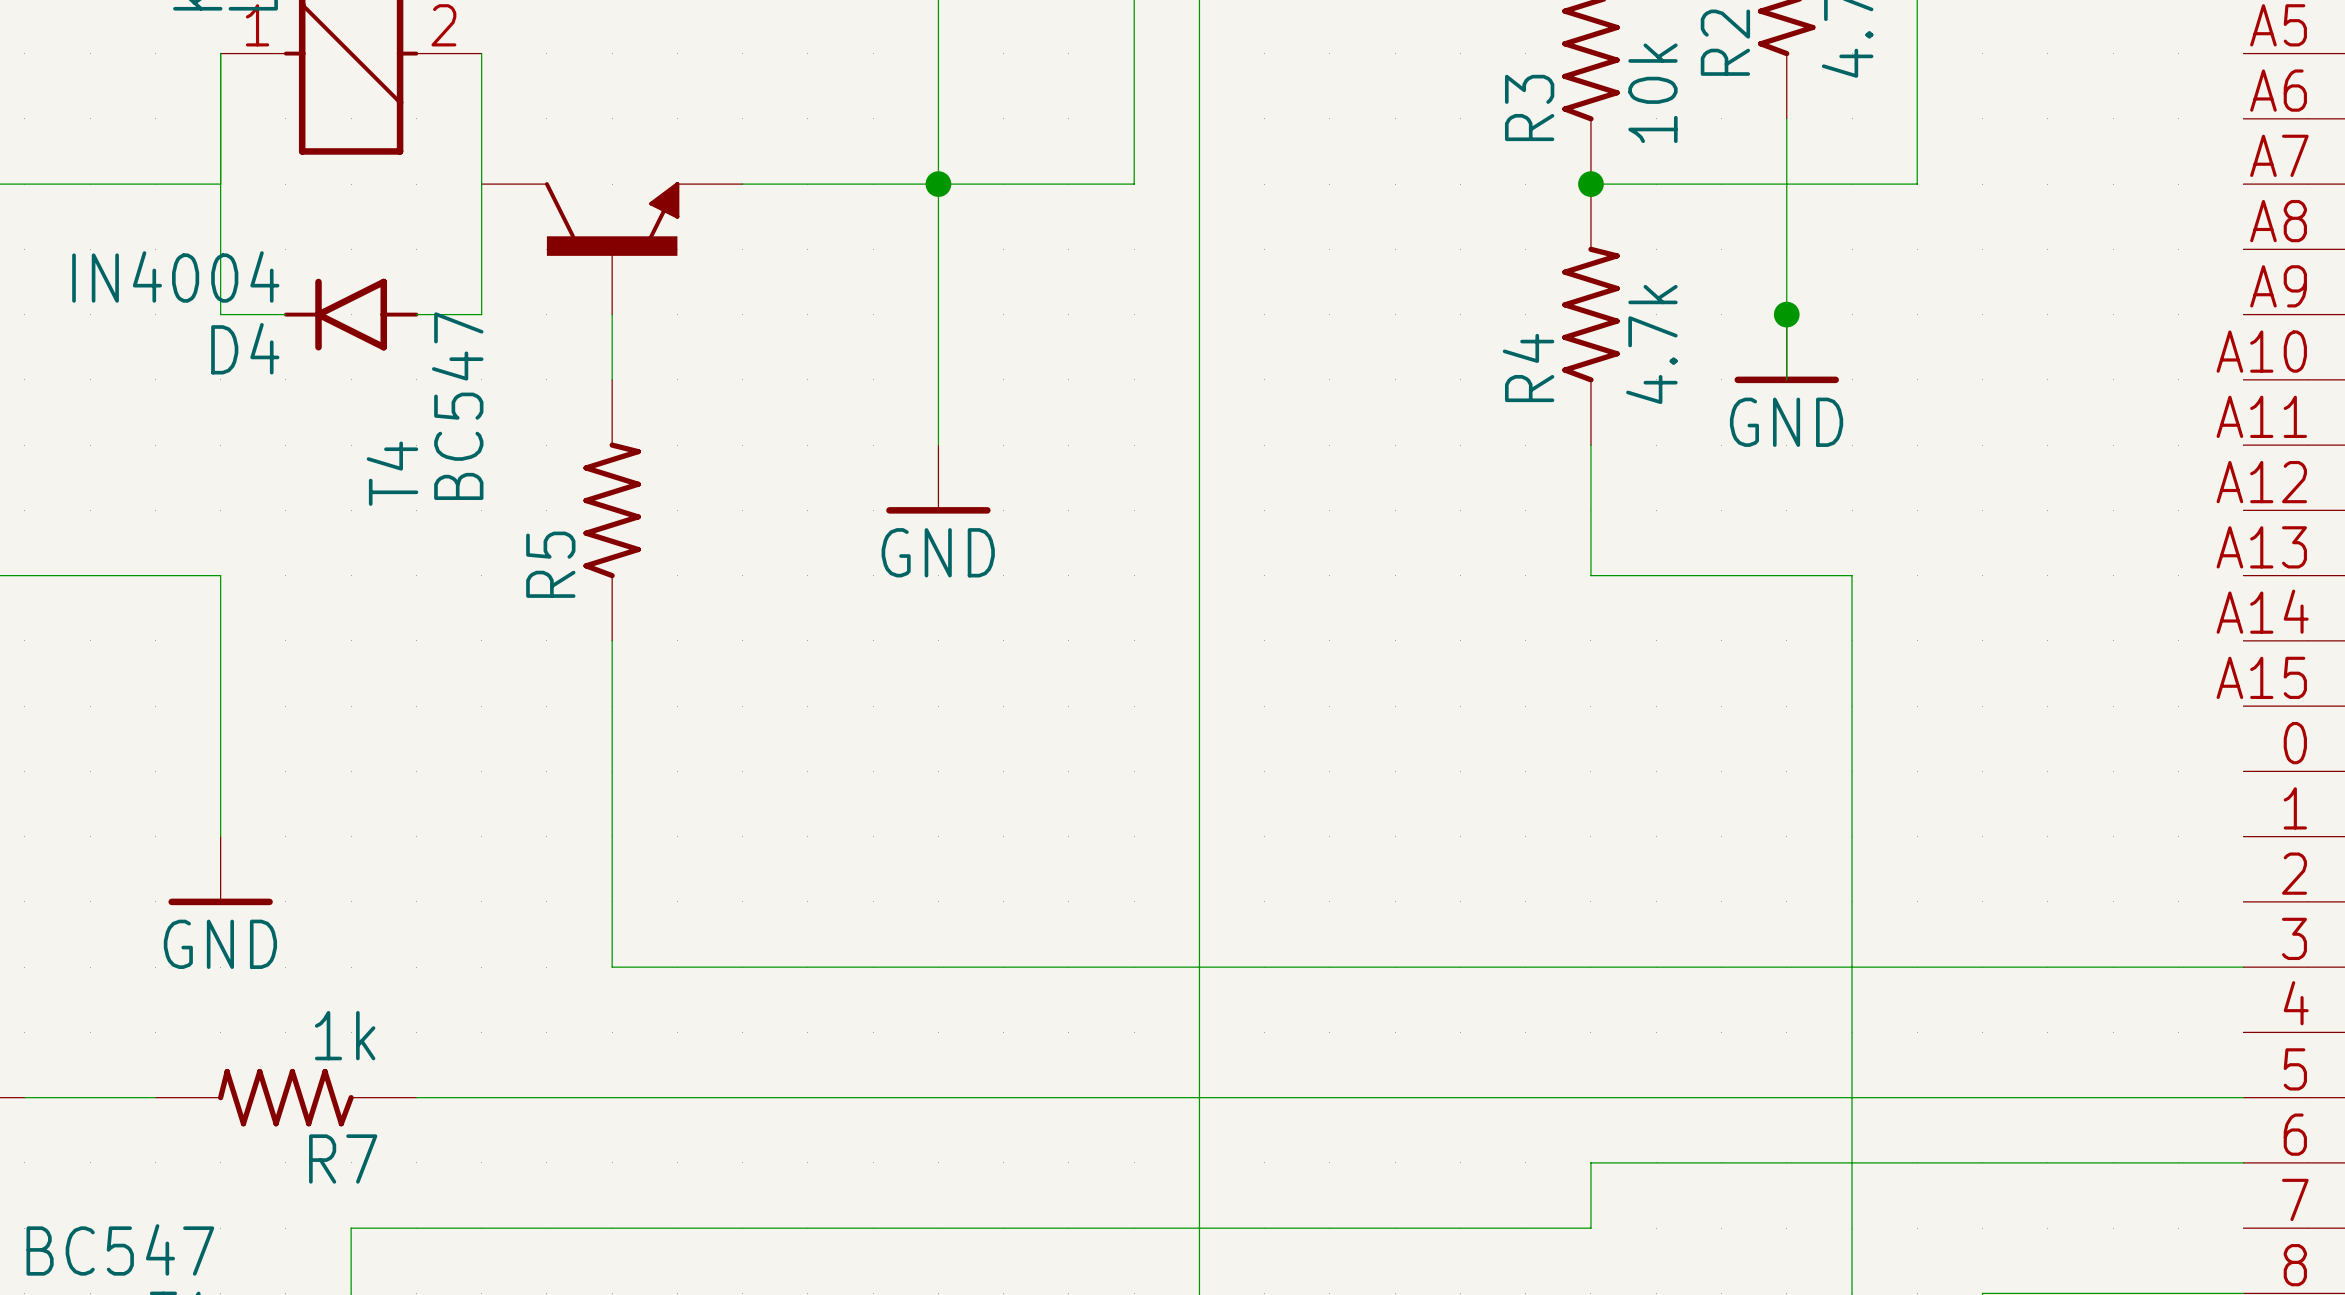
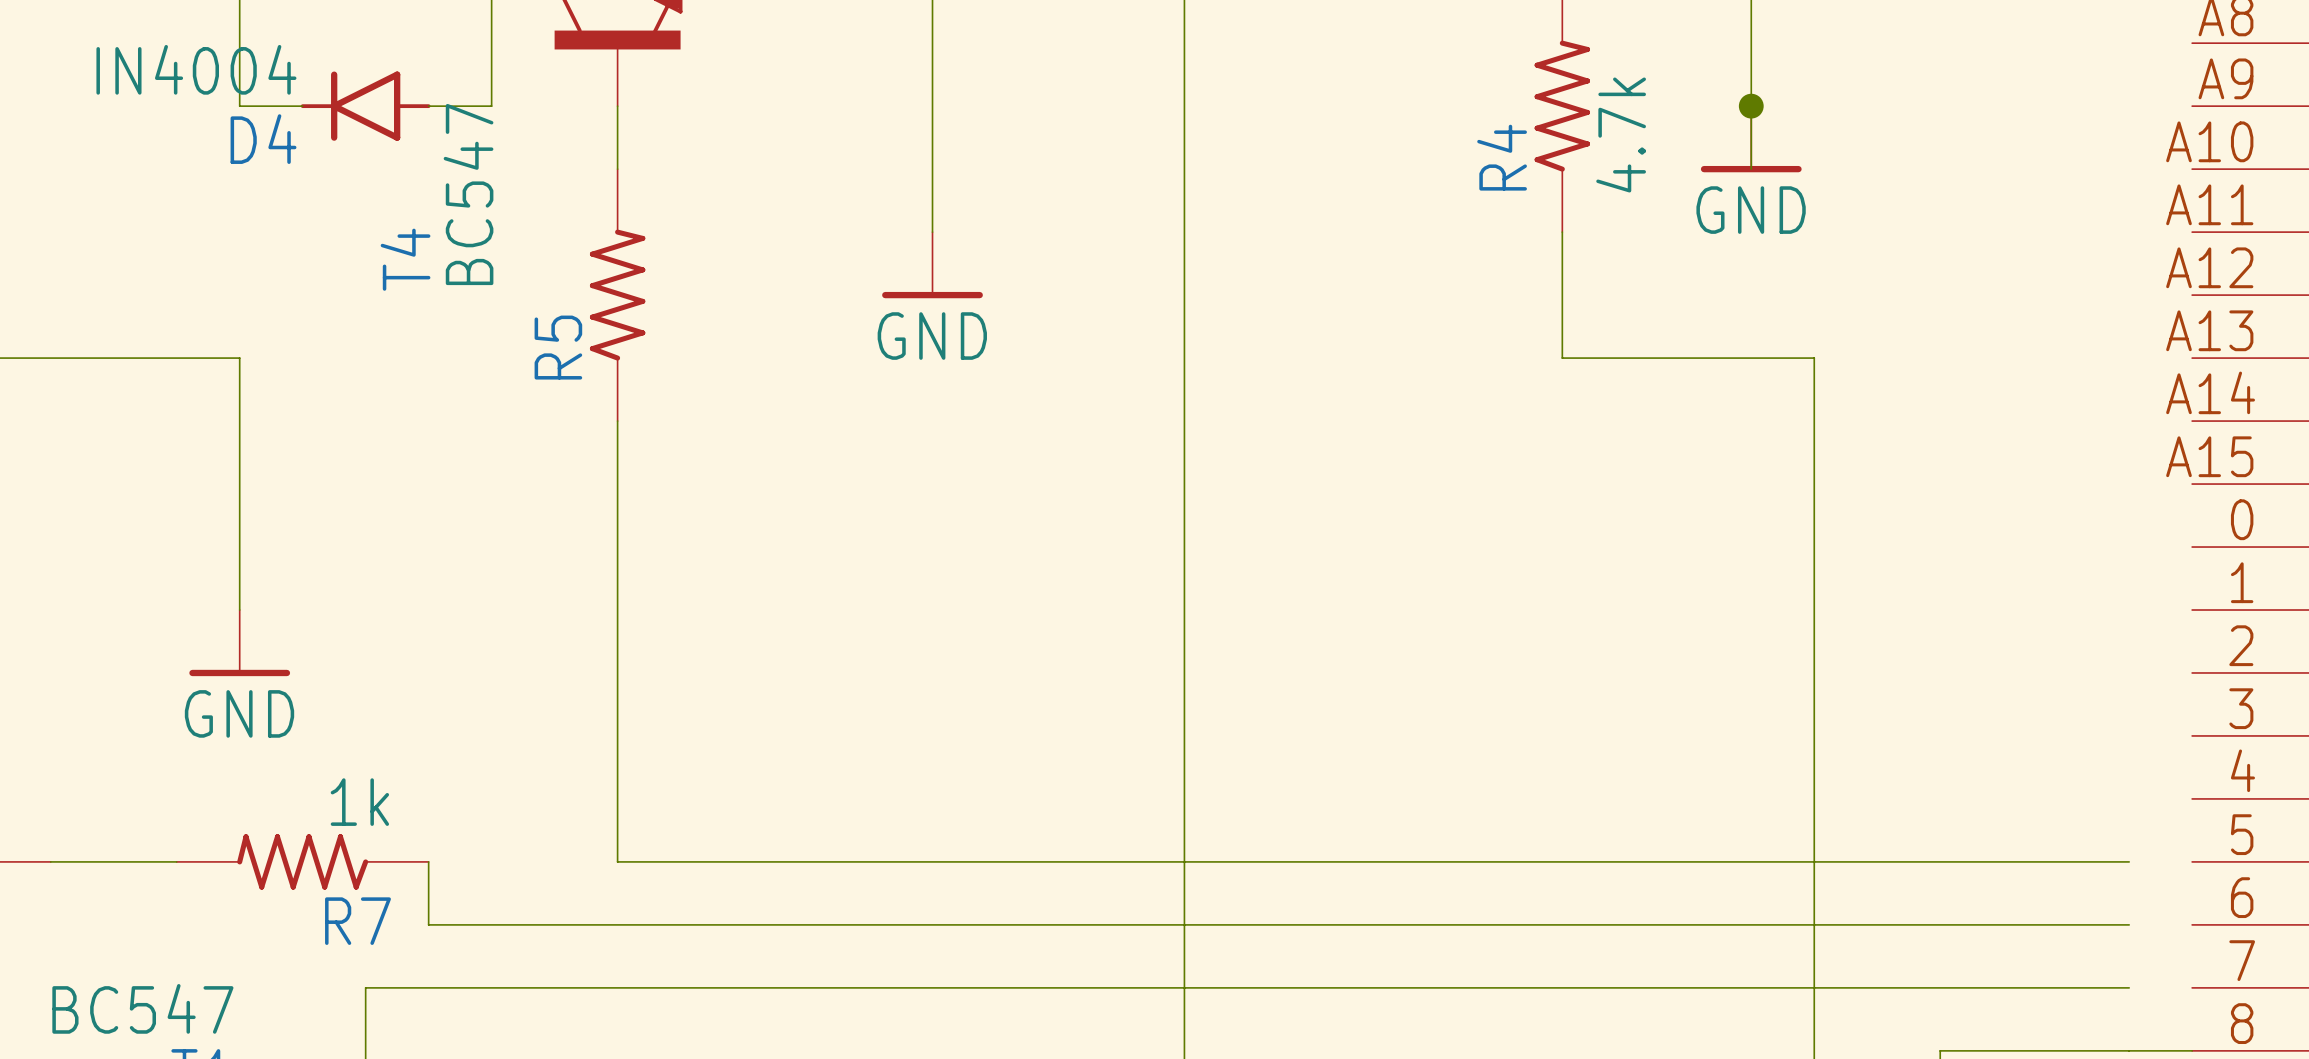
wire: (612, 967) (2243, 967) -> none
wire: (416, 1097) (612, 1097) -> (617, 735) (617, 861)
wire: none -> (428, 861) (428, 924) (1562, 924)
wire: (2178, 1097) (2243, 1097) -> none
wire: (1590, 1162) (1590, 1228) -> (2129, 987) (1562, 987)
wire: (2178, 1162) (2243, 1162) -> none

